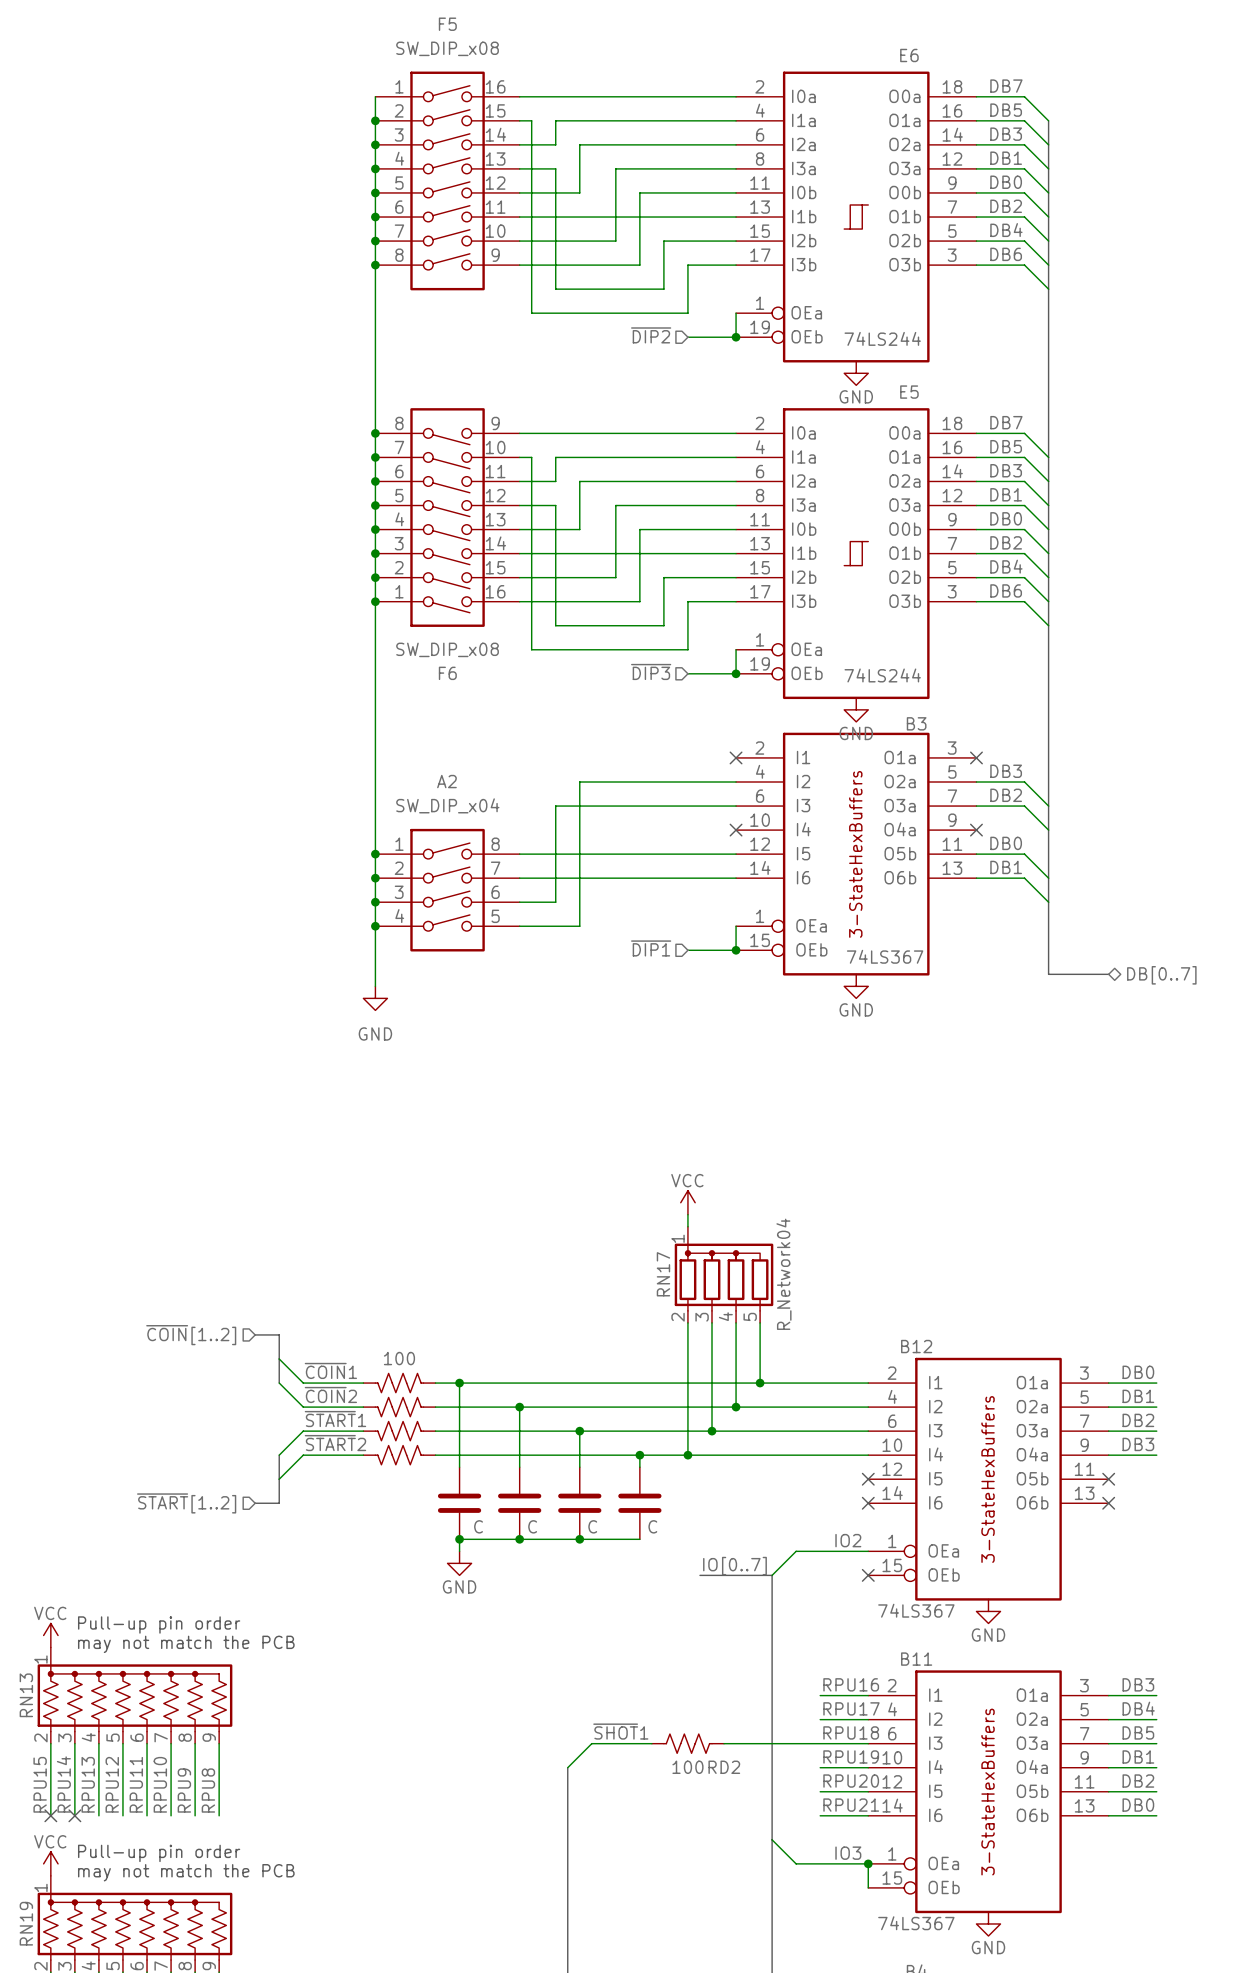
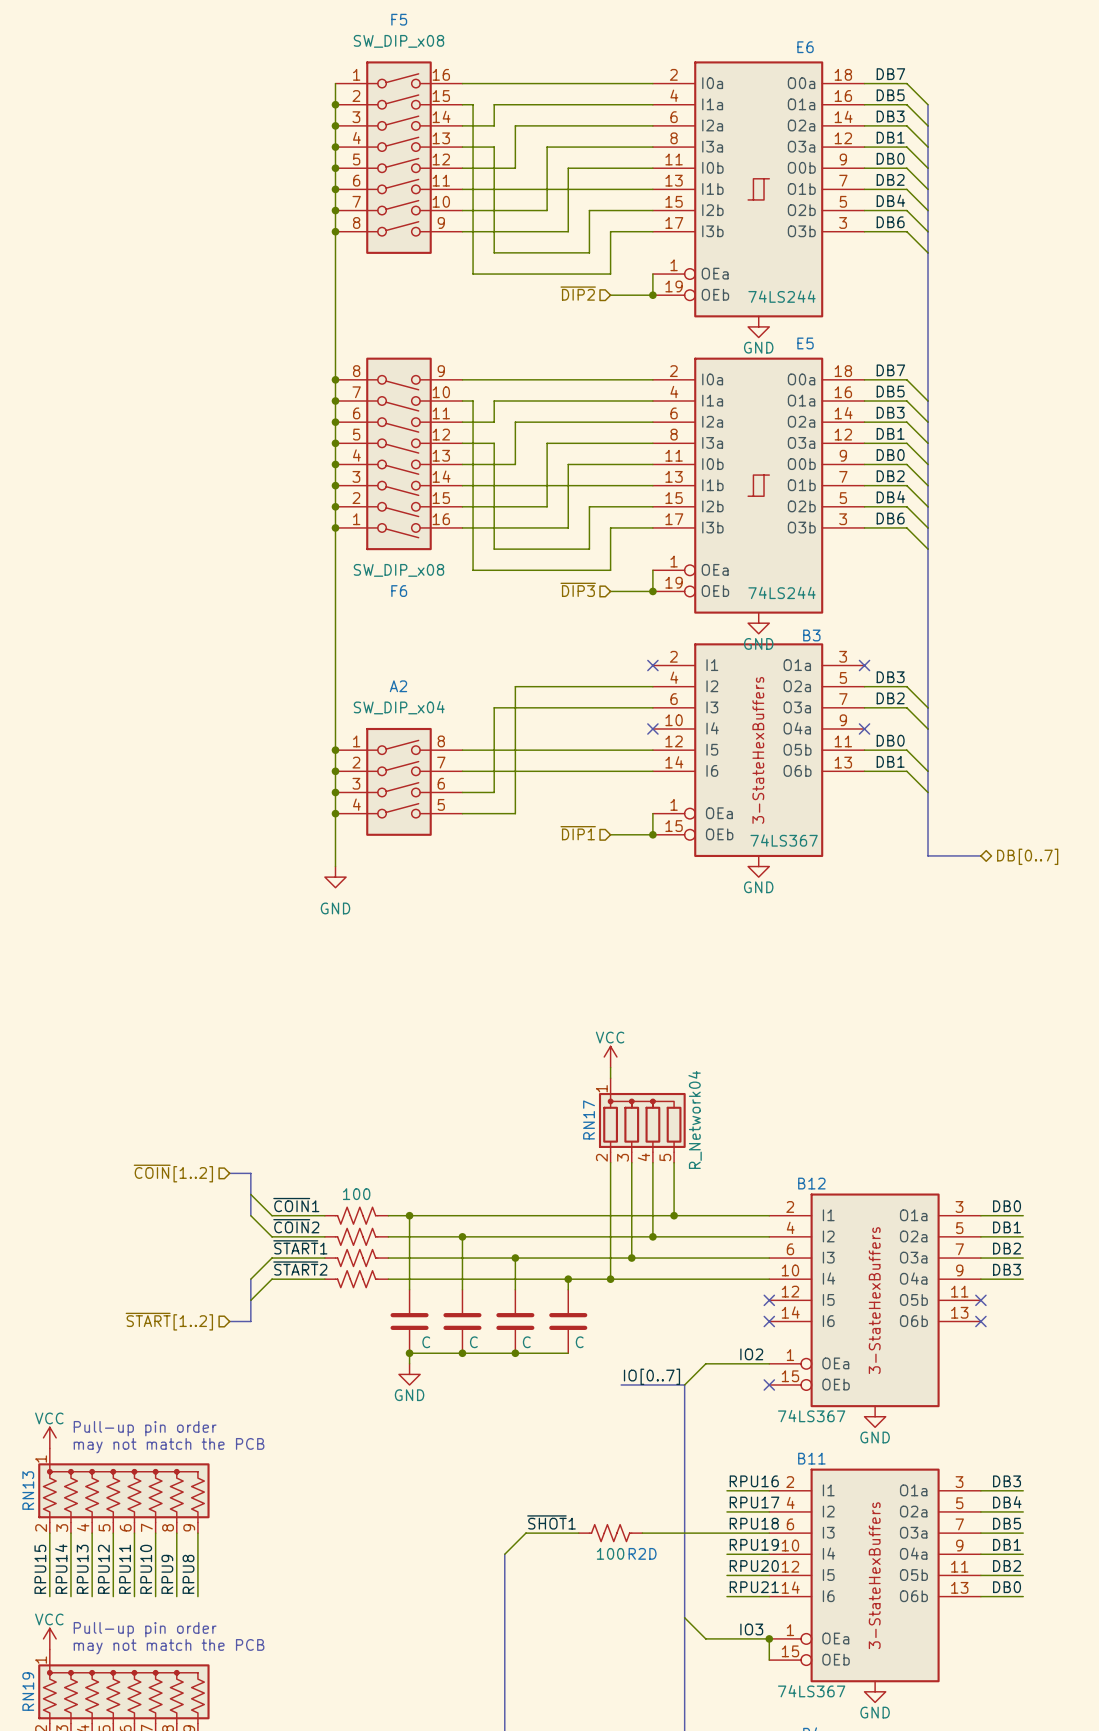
RD2 name: RD2 (724, 1767) -> R2D (642, 1553)
no-connect mark: (50, 1815) -> none
no-connect mark: (74, 1815) -> none

